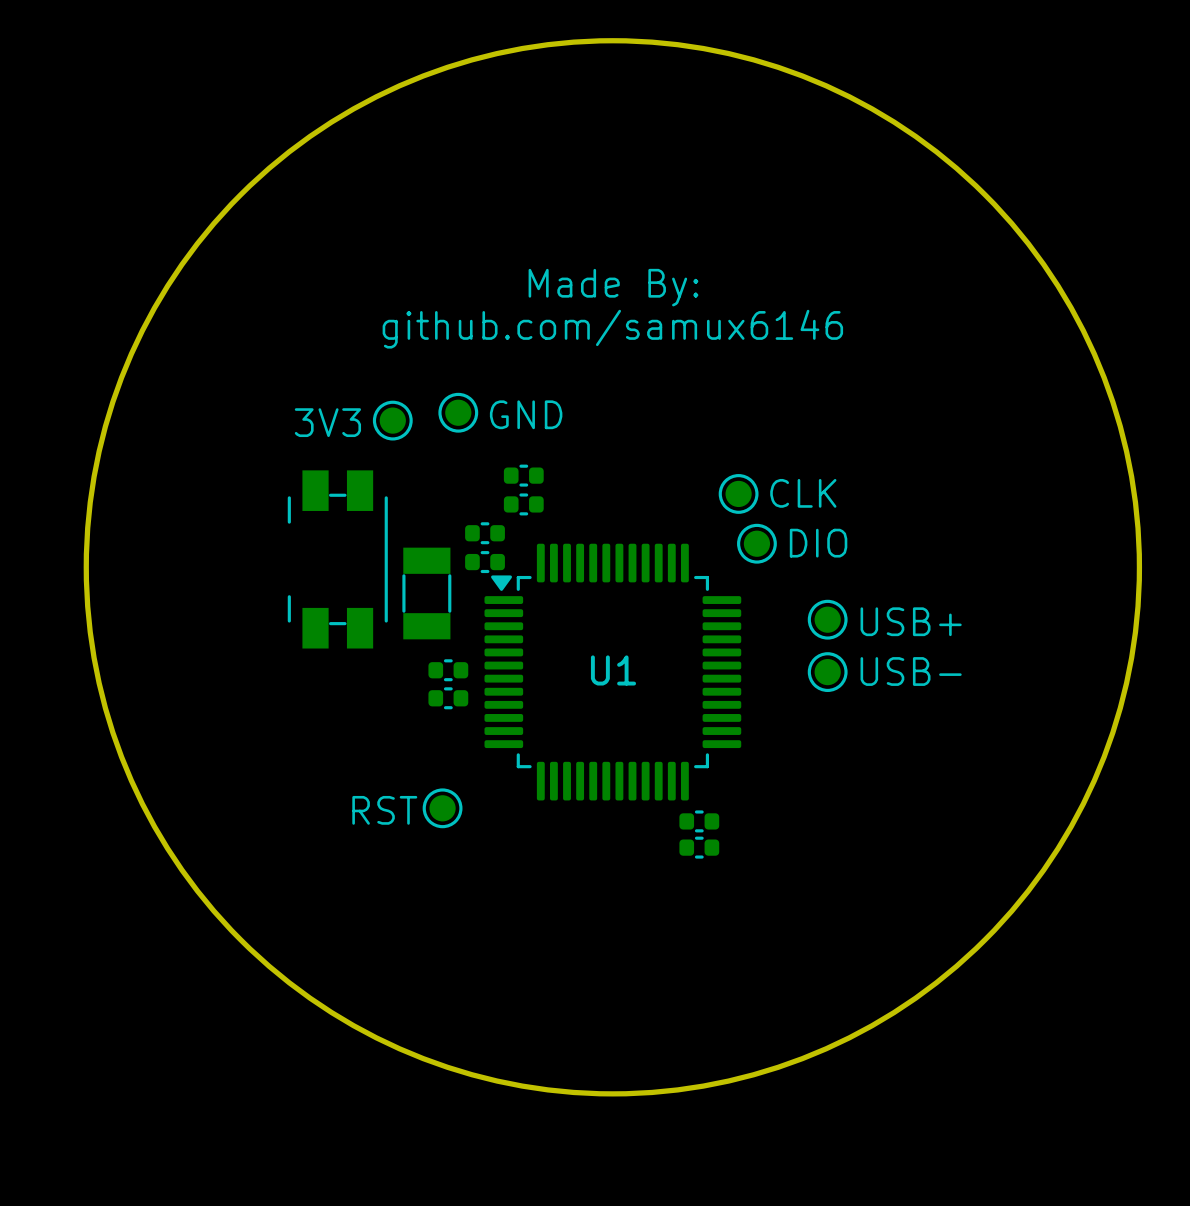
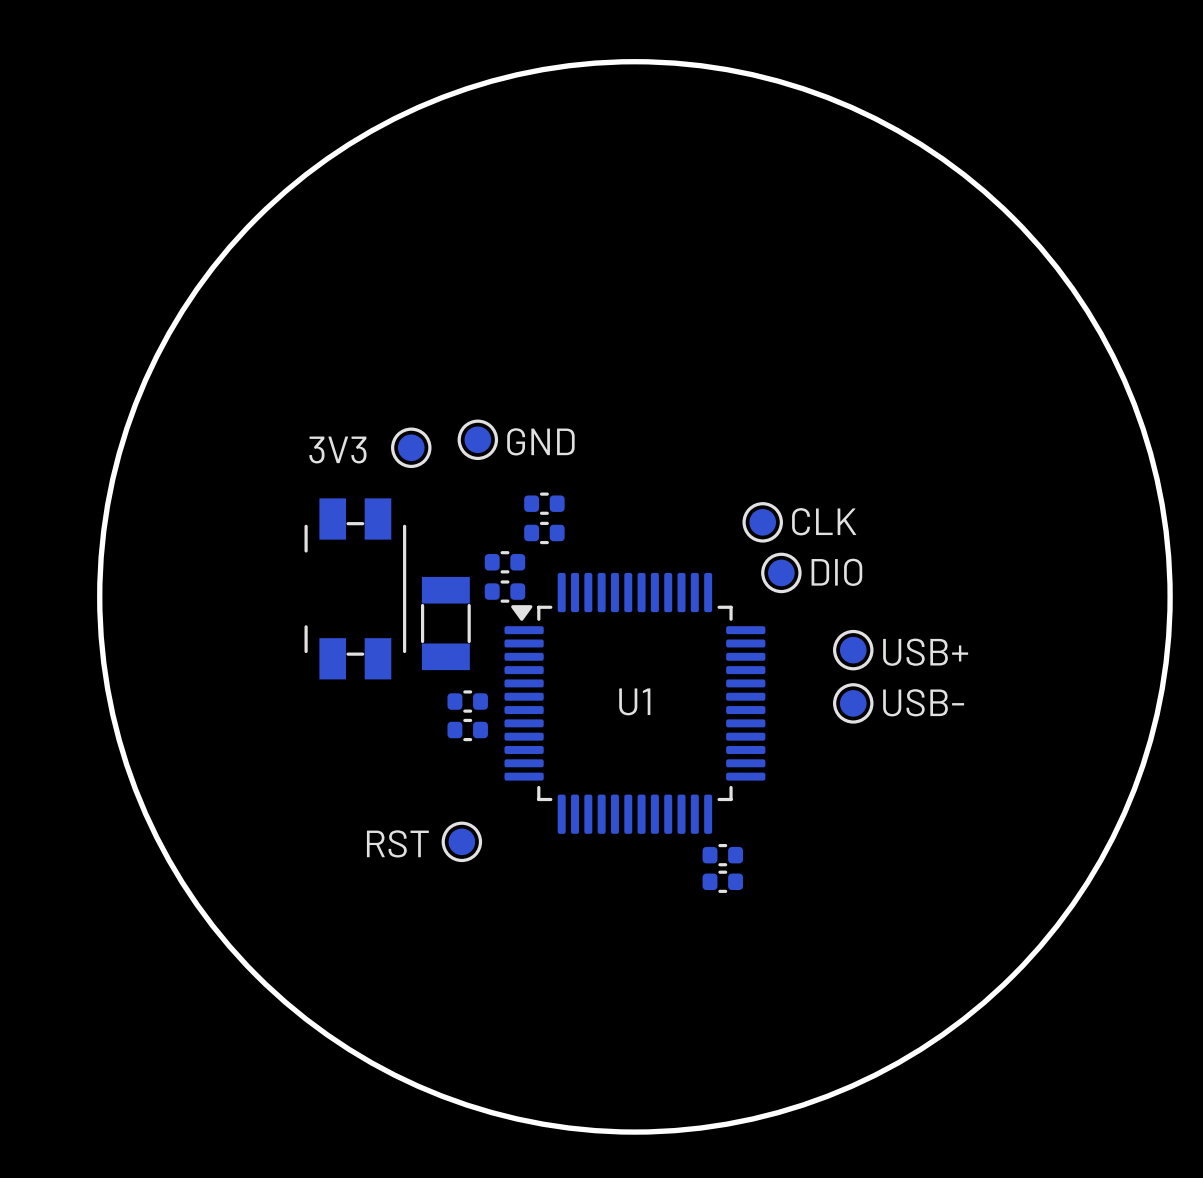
text: Made By: (613, 287) -> none
text: github.com/samux6146 (612, 329) -> none

